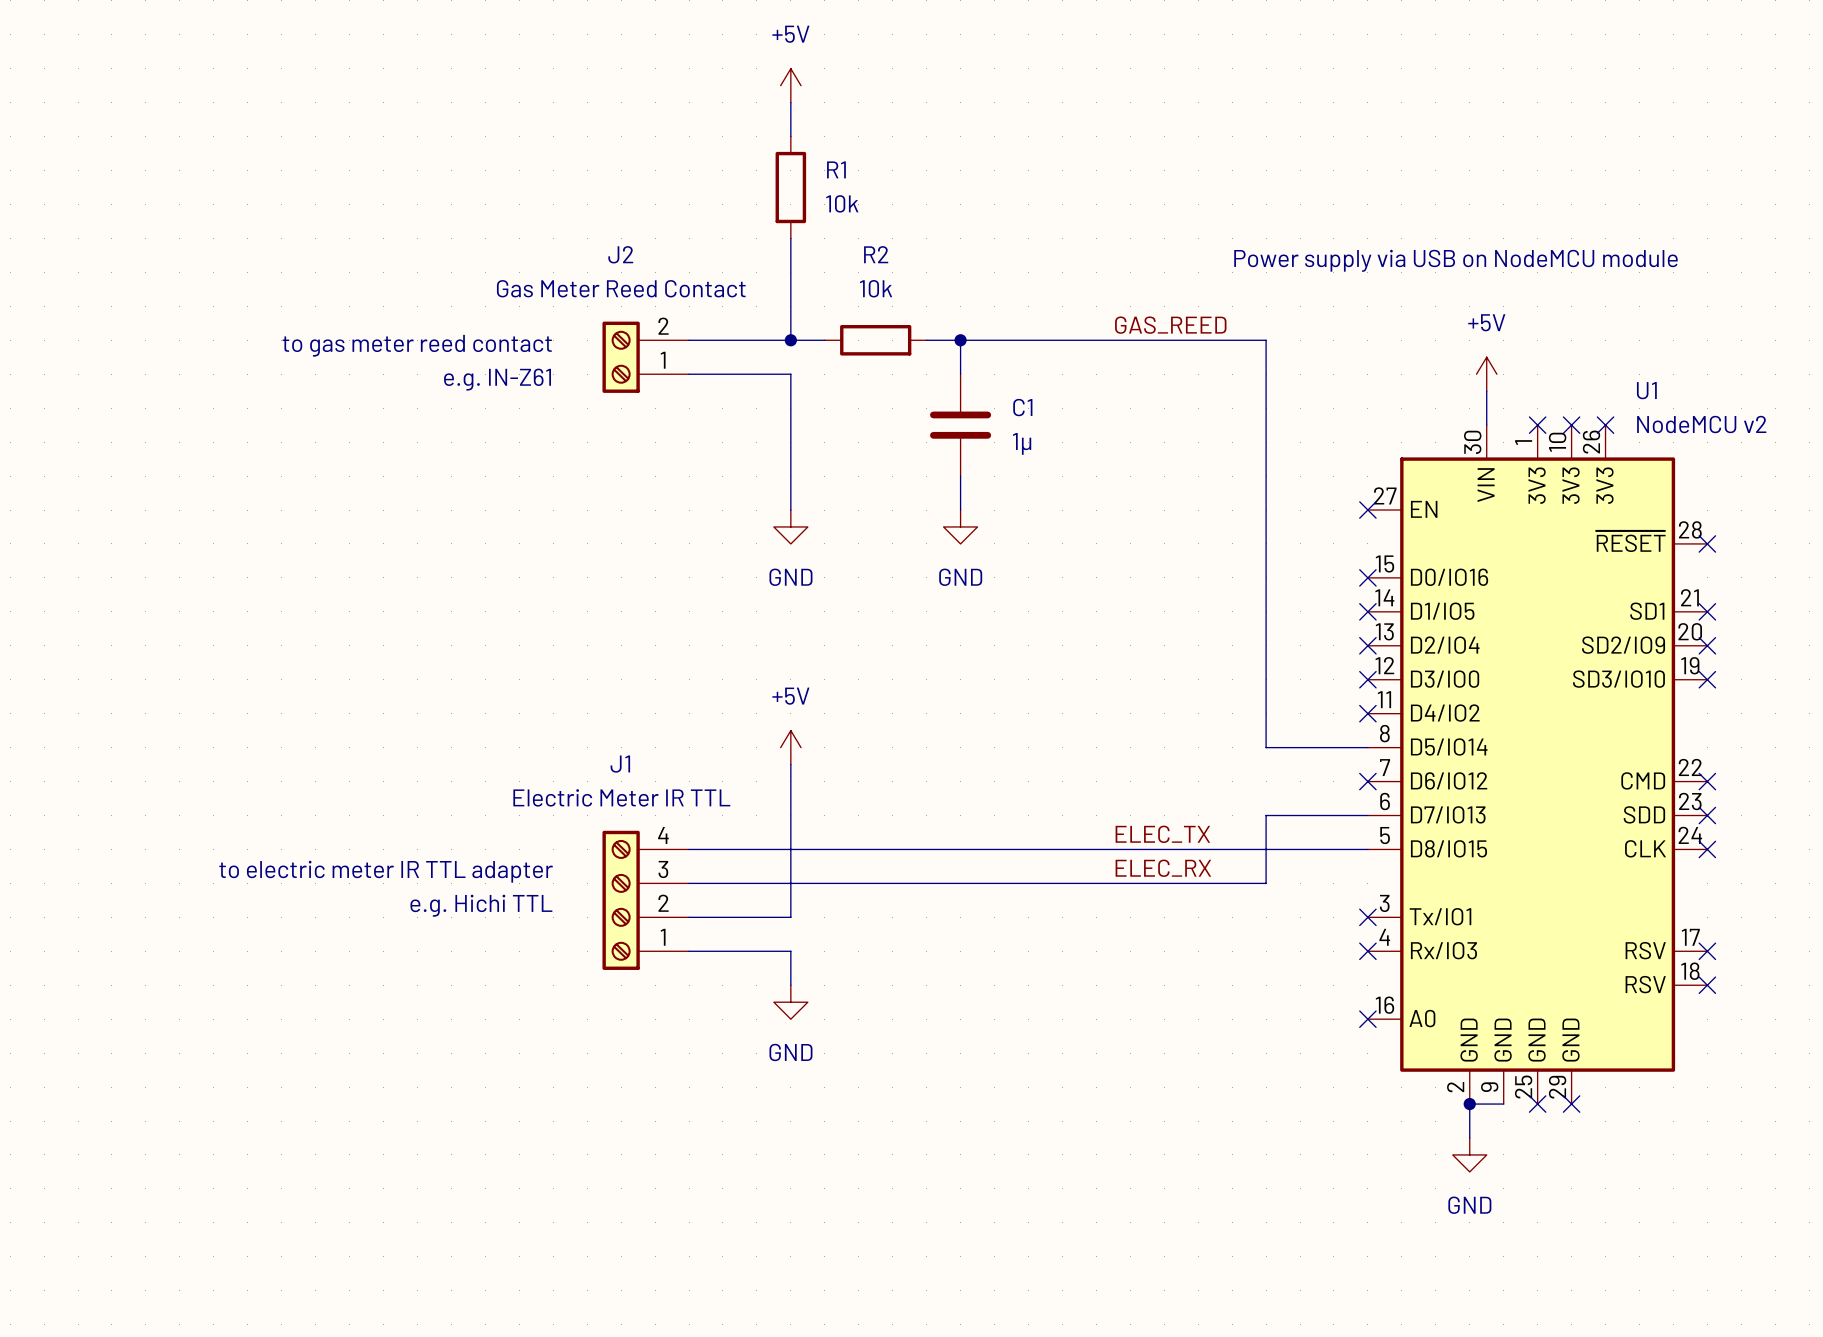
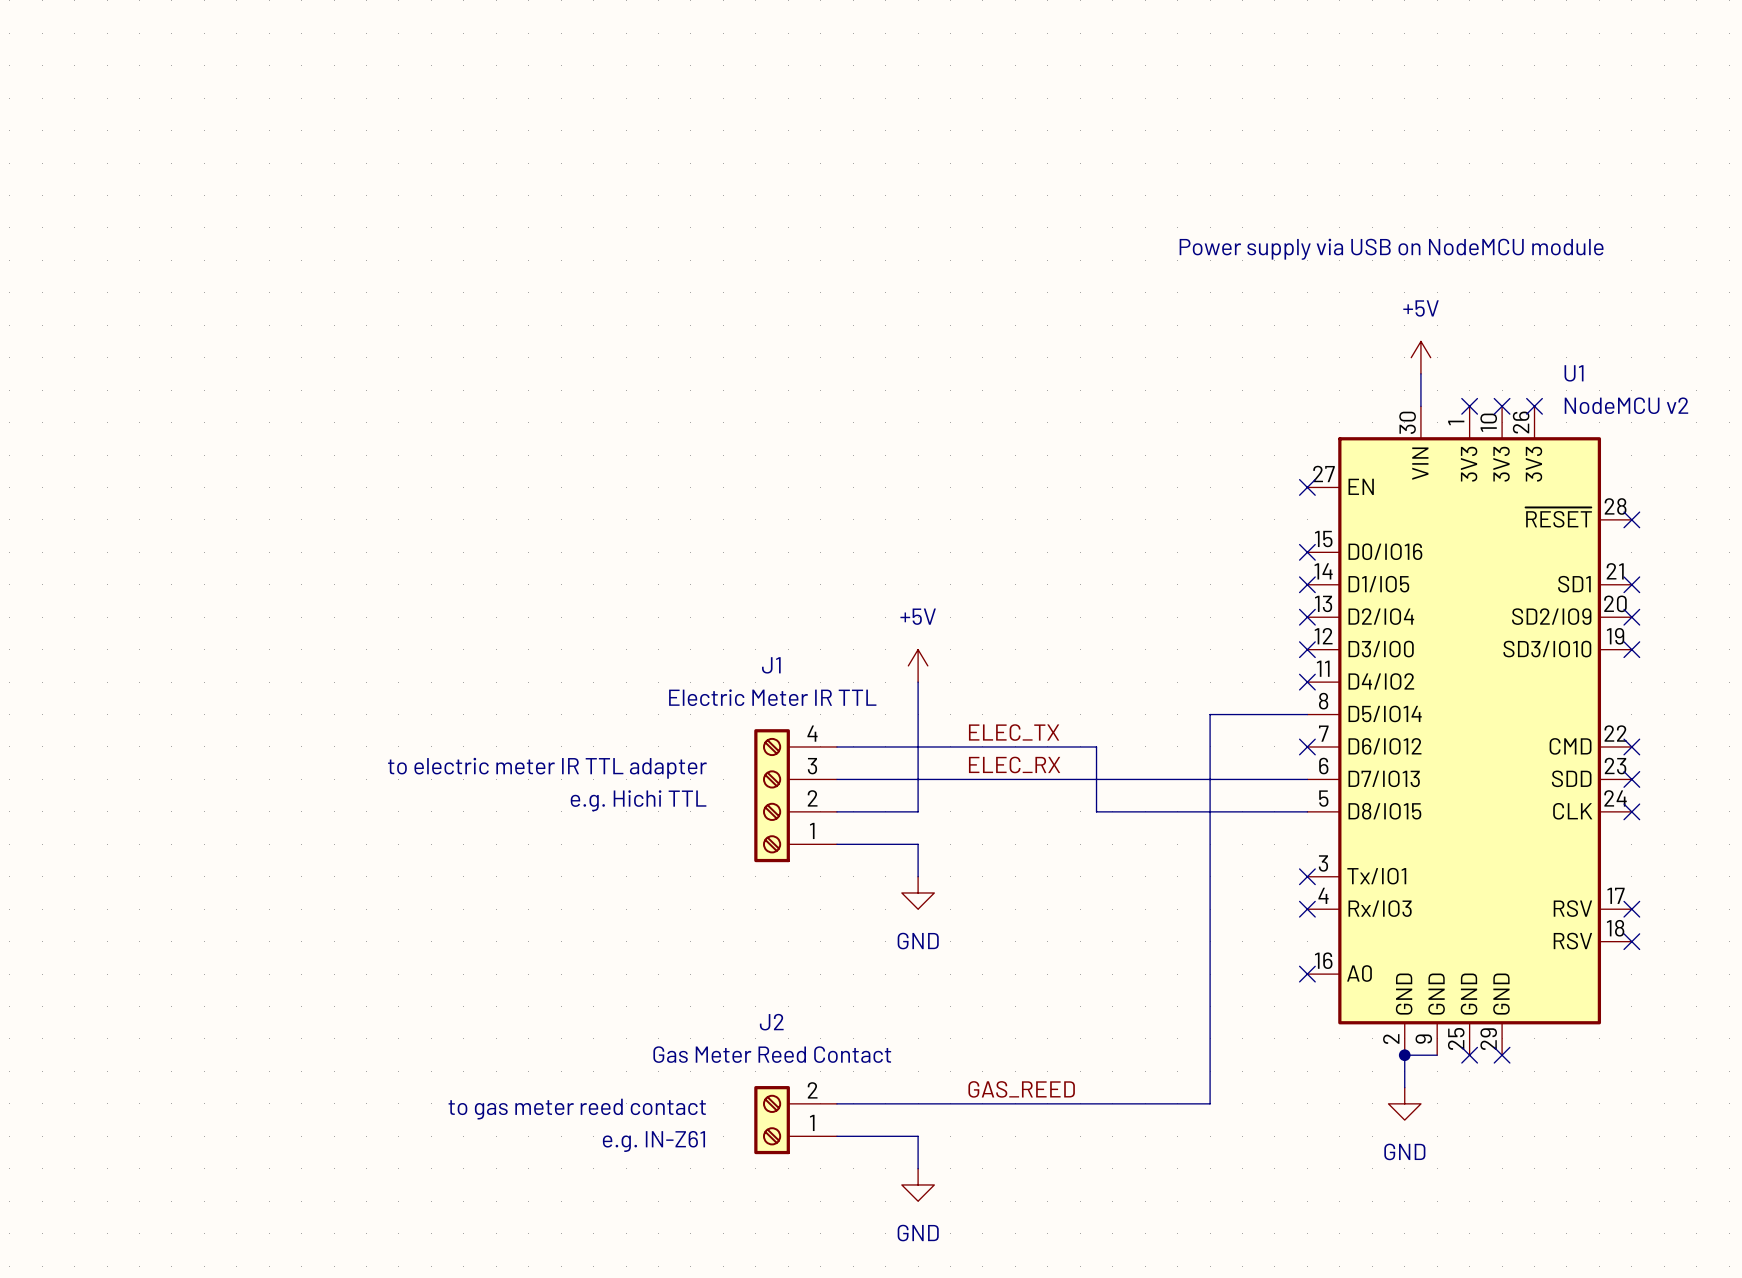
power symbol: +5V (790, 85) -> none
wire: (790, 102) (790, 136) -> none
R1: 10k (790, 187) -> none
wire: (790, 238) (790, 340) -> none
label: GAS_REED (1170, 325) -> none
wire: (689, 340) (824, 340) -> none
junction: (790, 340) -> none
R2: 10k (875, 340) -> none
wire: (926, 340) (1266, 340) (1266, 747) -> (836, 779) (1210, 779) (1210, 714)
wire: (960, 340) (960, 374) -> none
junction: (960, 340) -> none
text: to gas meter reed contact (417, 345) -> none
J2 position: (645, 357) -> (795, 1120)
wire: (689, 374) (790, 374) (790, 510) -> none
text: e.g. IN-Z61 (497, 379) -> none
C1: 1µ (960, 425) -> none
wire: (960, 476) (960, 510) -> none
power symbol: GND (790, 526) -> none
power symbol: GND (960, 526) -> none
wire: none -> (918, 682) (918, 811)
power symbol position: +5V (790, 747) -> +5V (918, 665)
wire: (790, 764) (790, 917) (689, 917) -> none
label position: ELEC_TX (1162, 834) -> ELEC_TX (1014, 732)
wire: (689, 849) (875, 849) -> none
wire: (960, 849) (1147, 849) -> (836, 746) (1096, 746) (1096, 811)
label position: ELEC_RX (1163, 868) -> ELEC_RX (1014, 764)
text position: to electric meter IR TTL adapter (386, 871) -> to electric meter IR TTL adapter (547, 768)
wire: (689, 883) (875, 883) -> none
wire: (960, 883) (1266, 883) -> (836, 1103) (1210, 1103) (1210, 844)
wire: none -> (918, 844) (918, 876)
J1 position: (645, 900) -> (795, 795)
text position: e.g. Hichi TTL (481, 905) -> e.g. Hichi TTL (638, 800)
power symbol: none -> GND (918, 892)
wire: (689, 951) (790, 951) (790, 985) -> none
power symbol: GND (790, 1002) -> none
label: none -> GAS_REED (1021, 1089)
text: none -> to gas meter reed contact (577, 1109)
wire: none -> (836, 1136) (918, 1136) (918, 1168)
text: none -> e.g. IN-Z61 (653, 1141)
power symbol: none -> GND (918, 1184)

